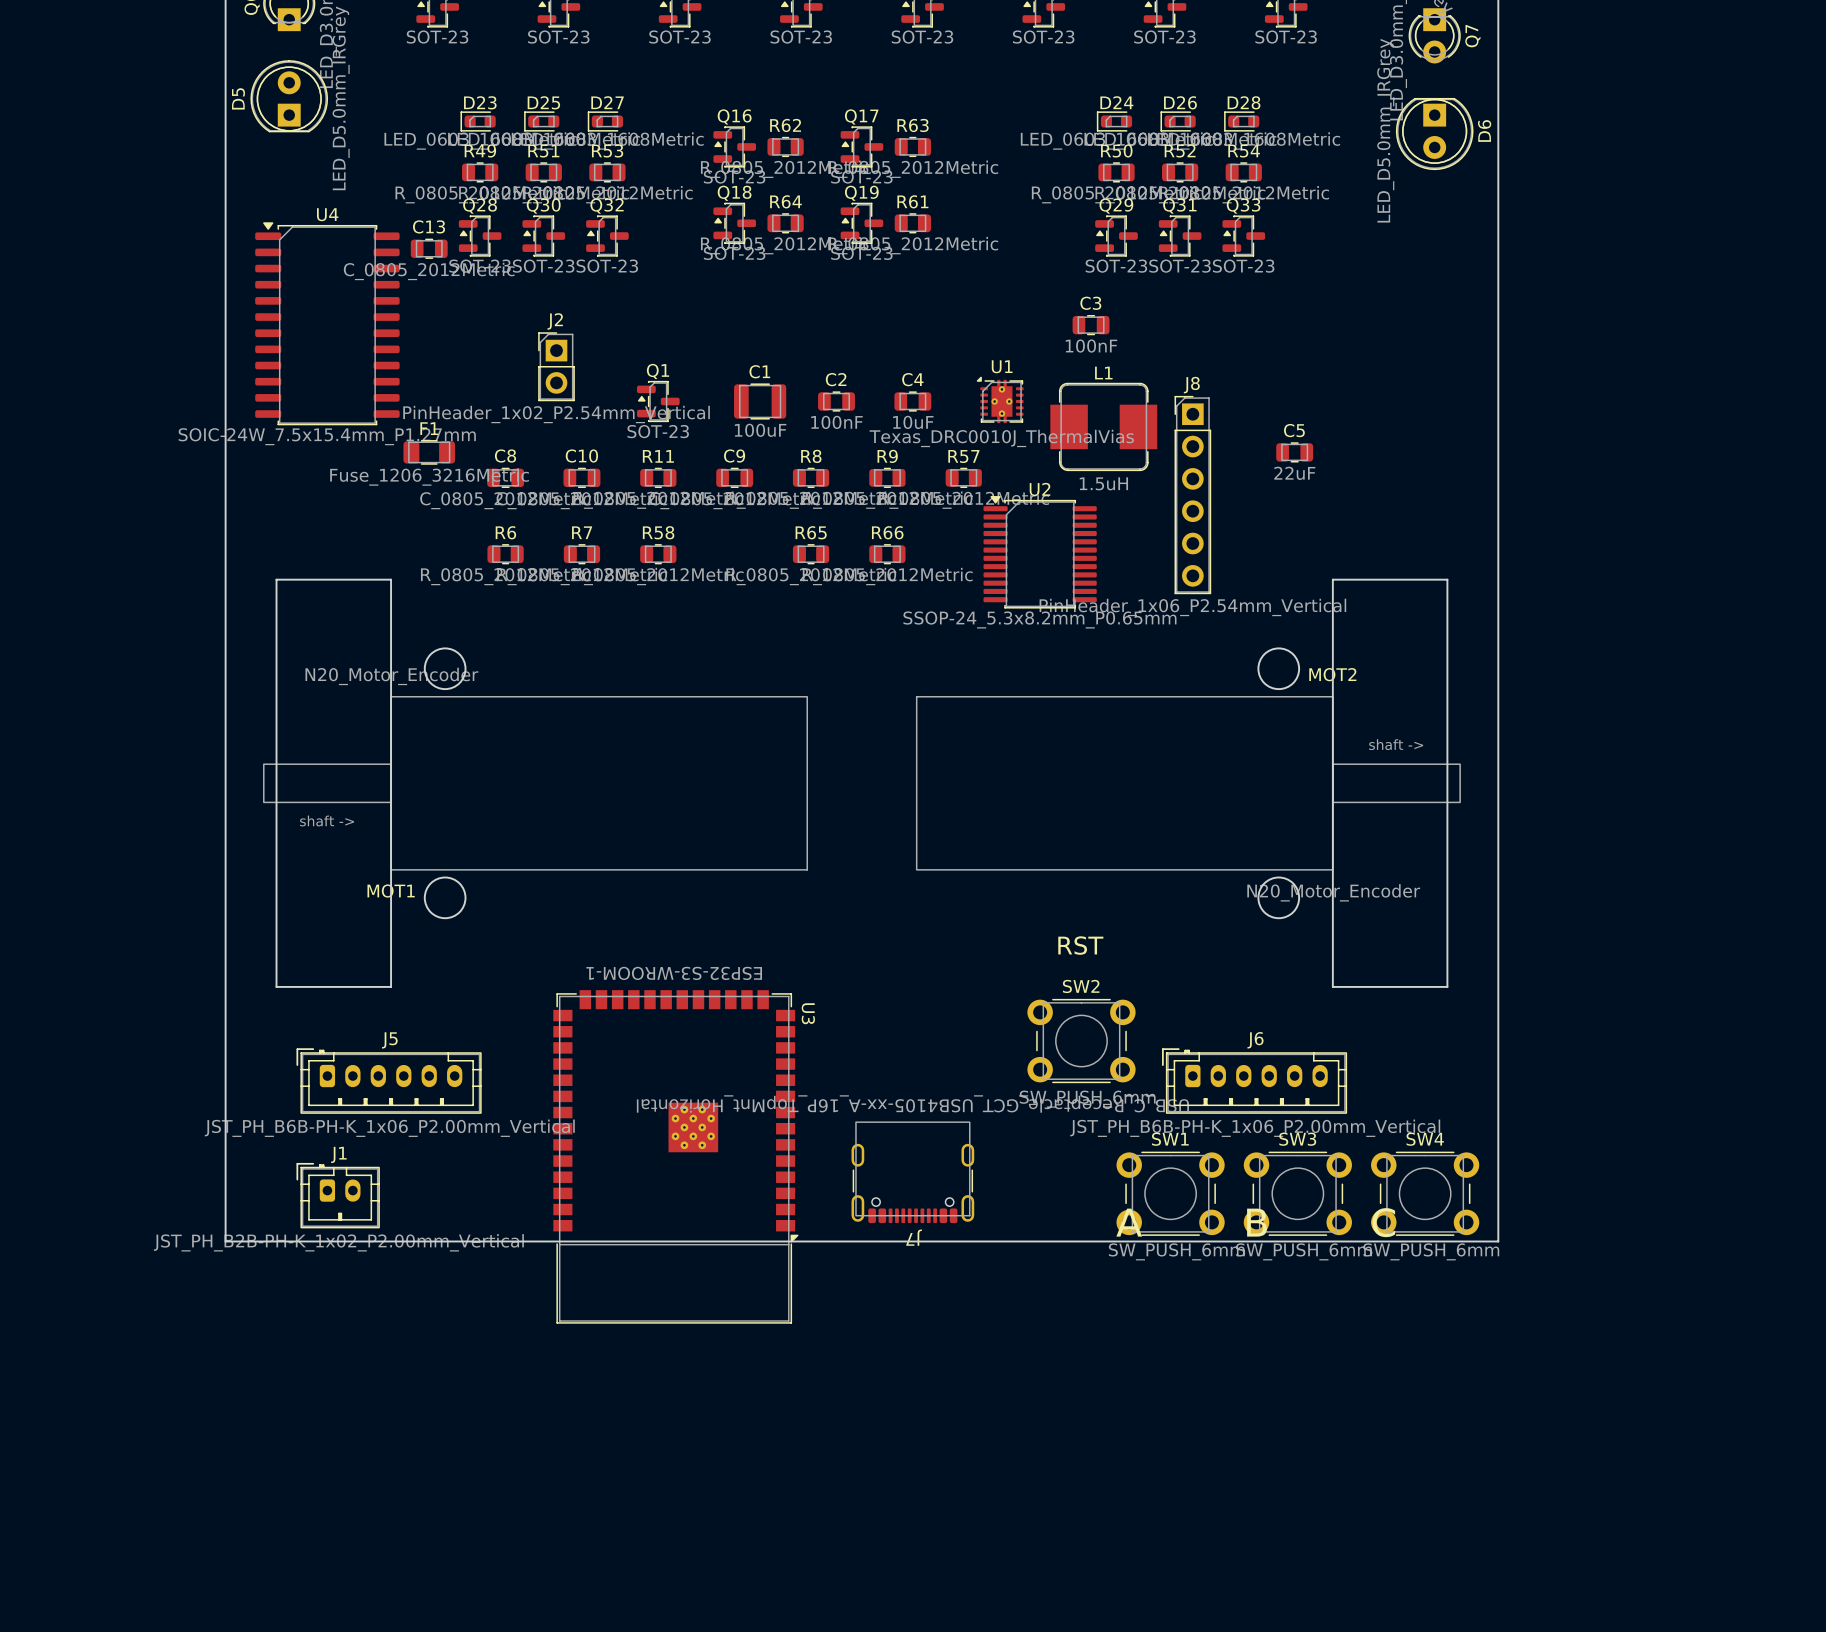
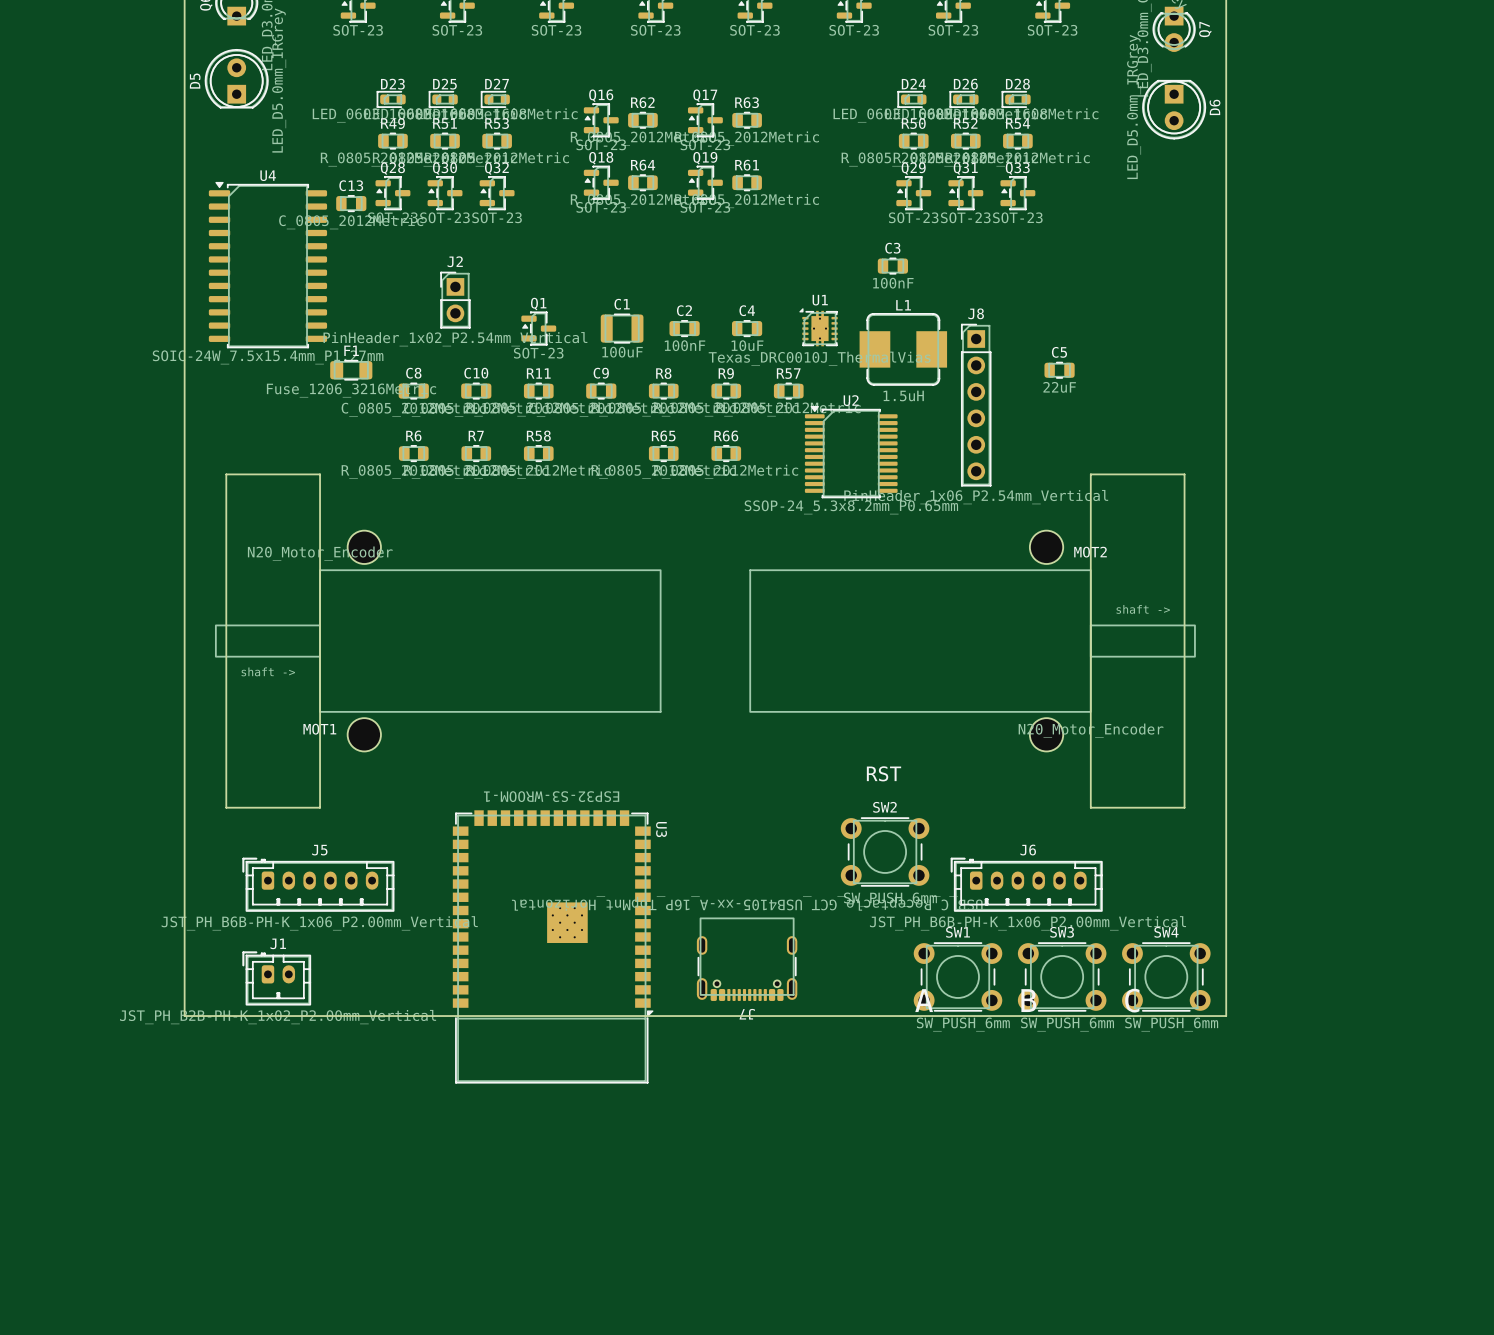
round board edge: [423, 647, 467, 691] -> none
round board edge: [1257, 647, 1301, 691] -> none
part: none -> (364, 547)
part: none -> (1046, 547)
round board edge: [423, 876, 467, 920] -> none
round board edge: [1257, 876, 1301, 920] -> none
part: none -> (364, 734)
part: none -> (1046, 734)

